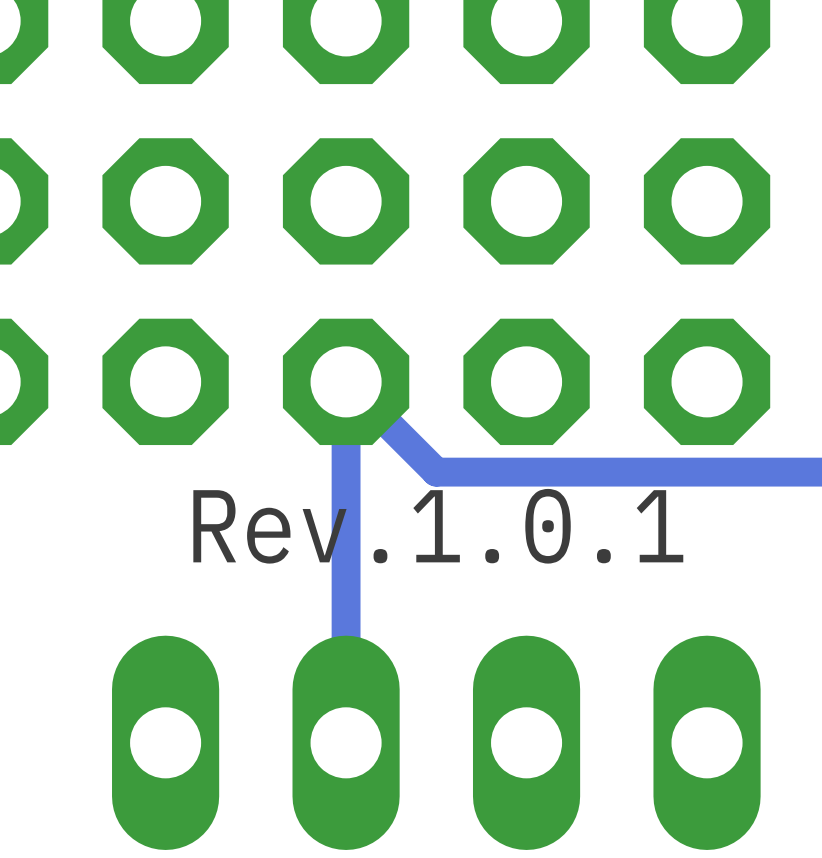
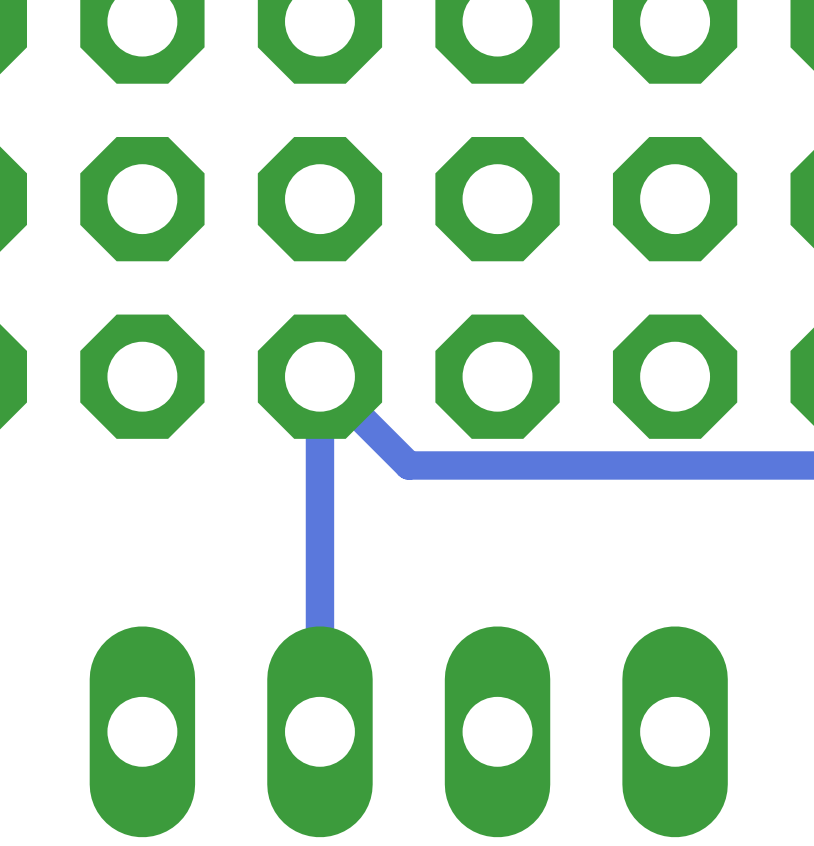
text: Rev.1.0.1 (438, 526) -> none

